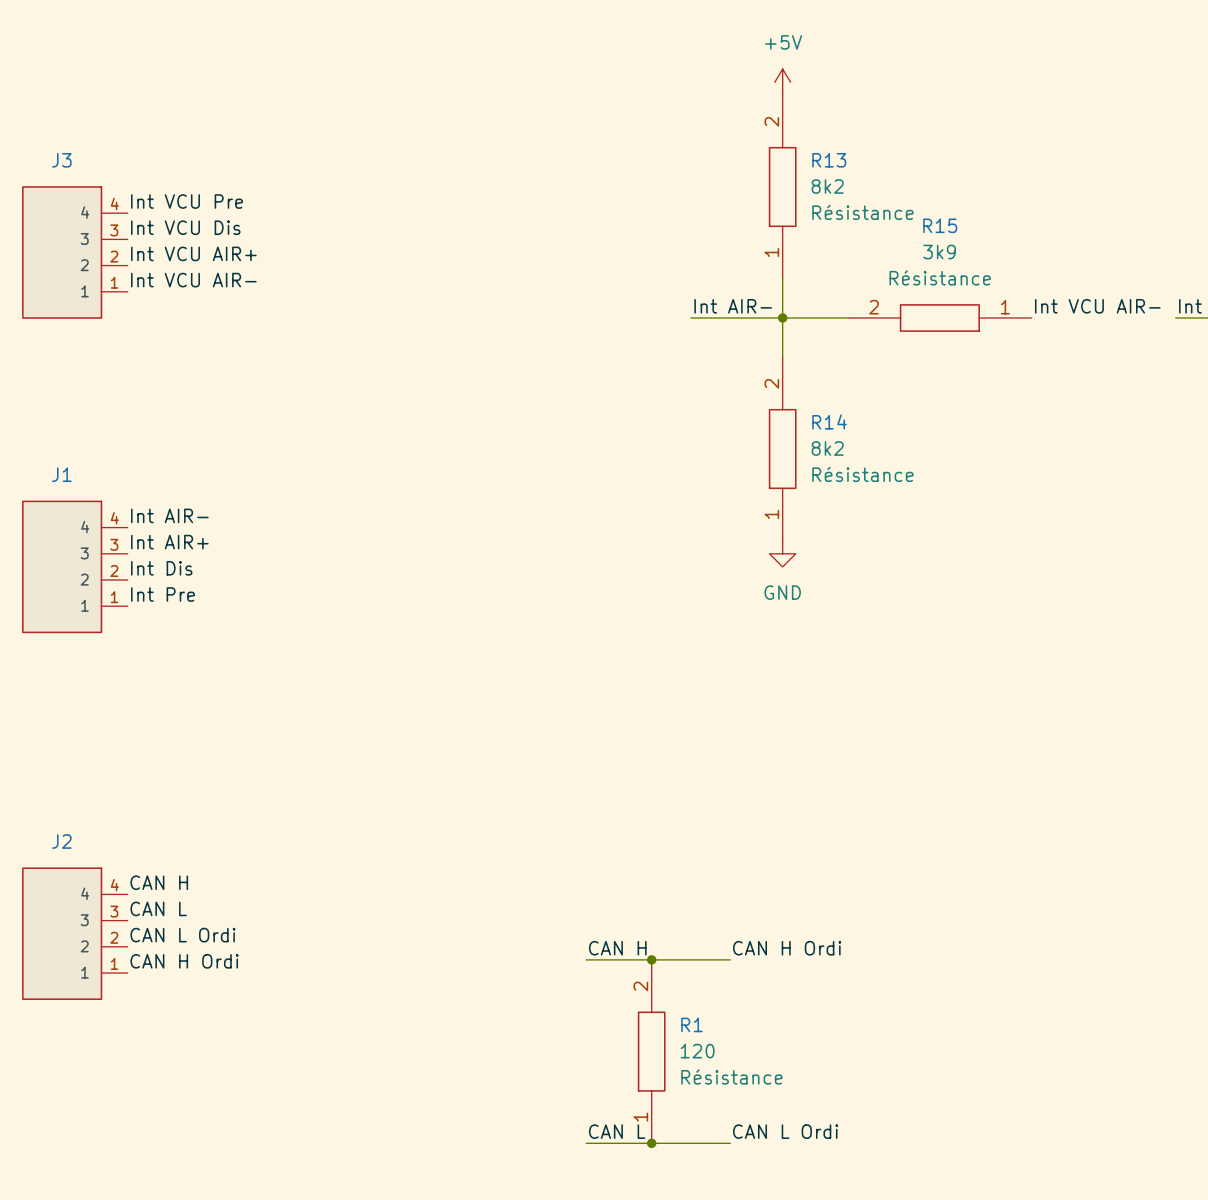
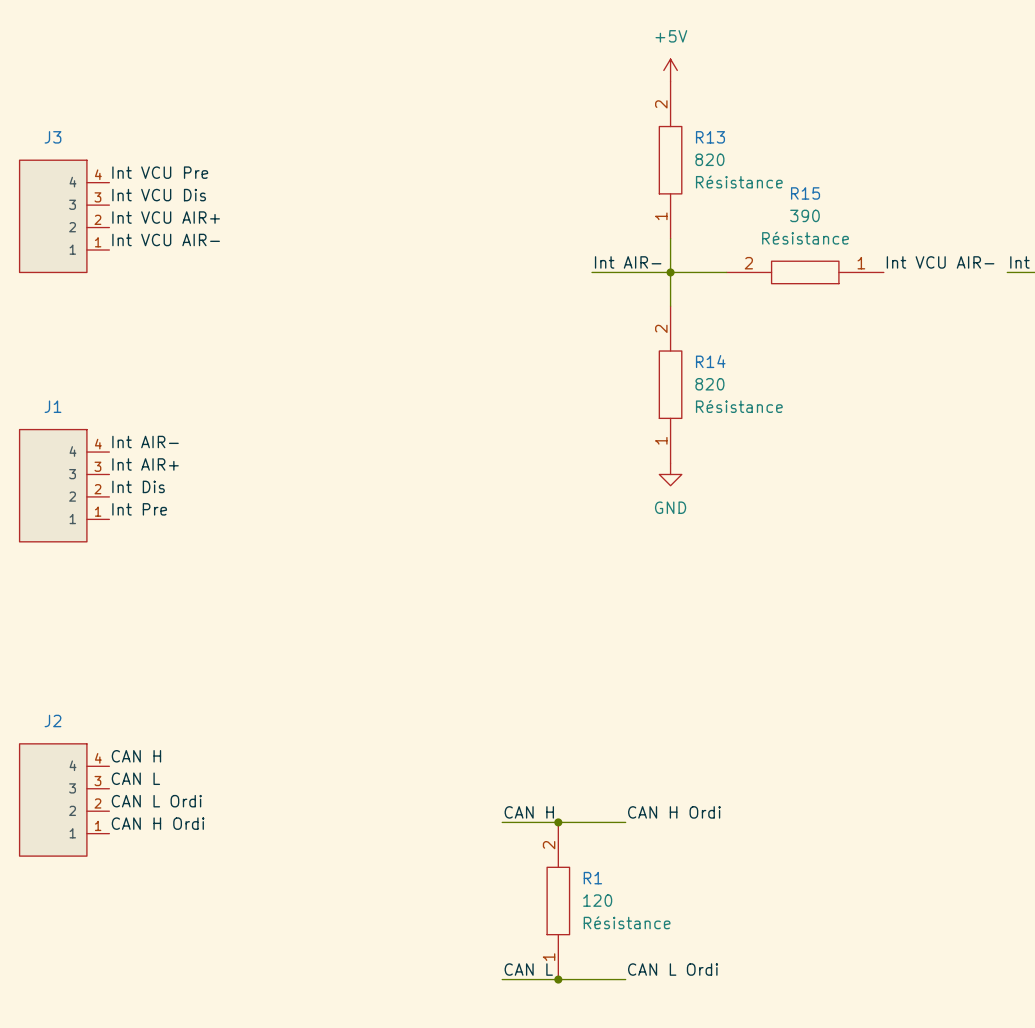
R13 value: 8k2 (827, 186) -> 820 (709, 159)
R15 value: 3k9 (939, 252) -> 390 (804, 215)
R14 value: 8k2 (827, 448) -> 820 (709, 384)

